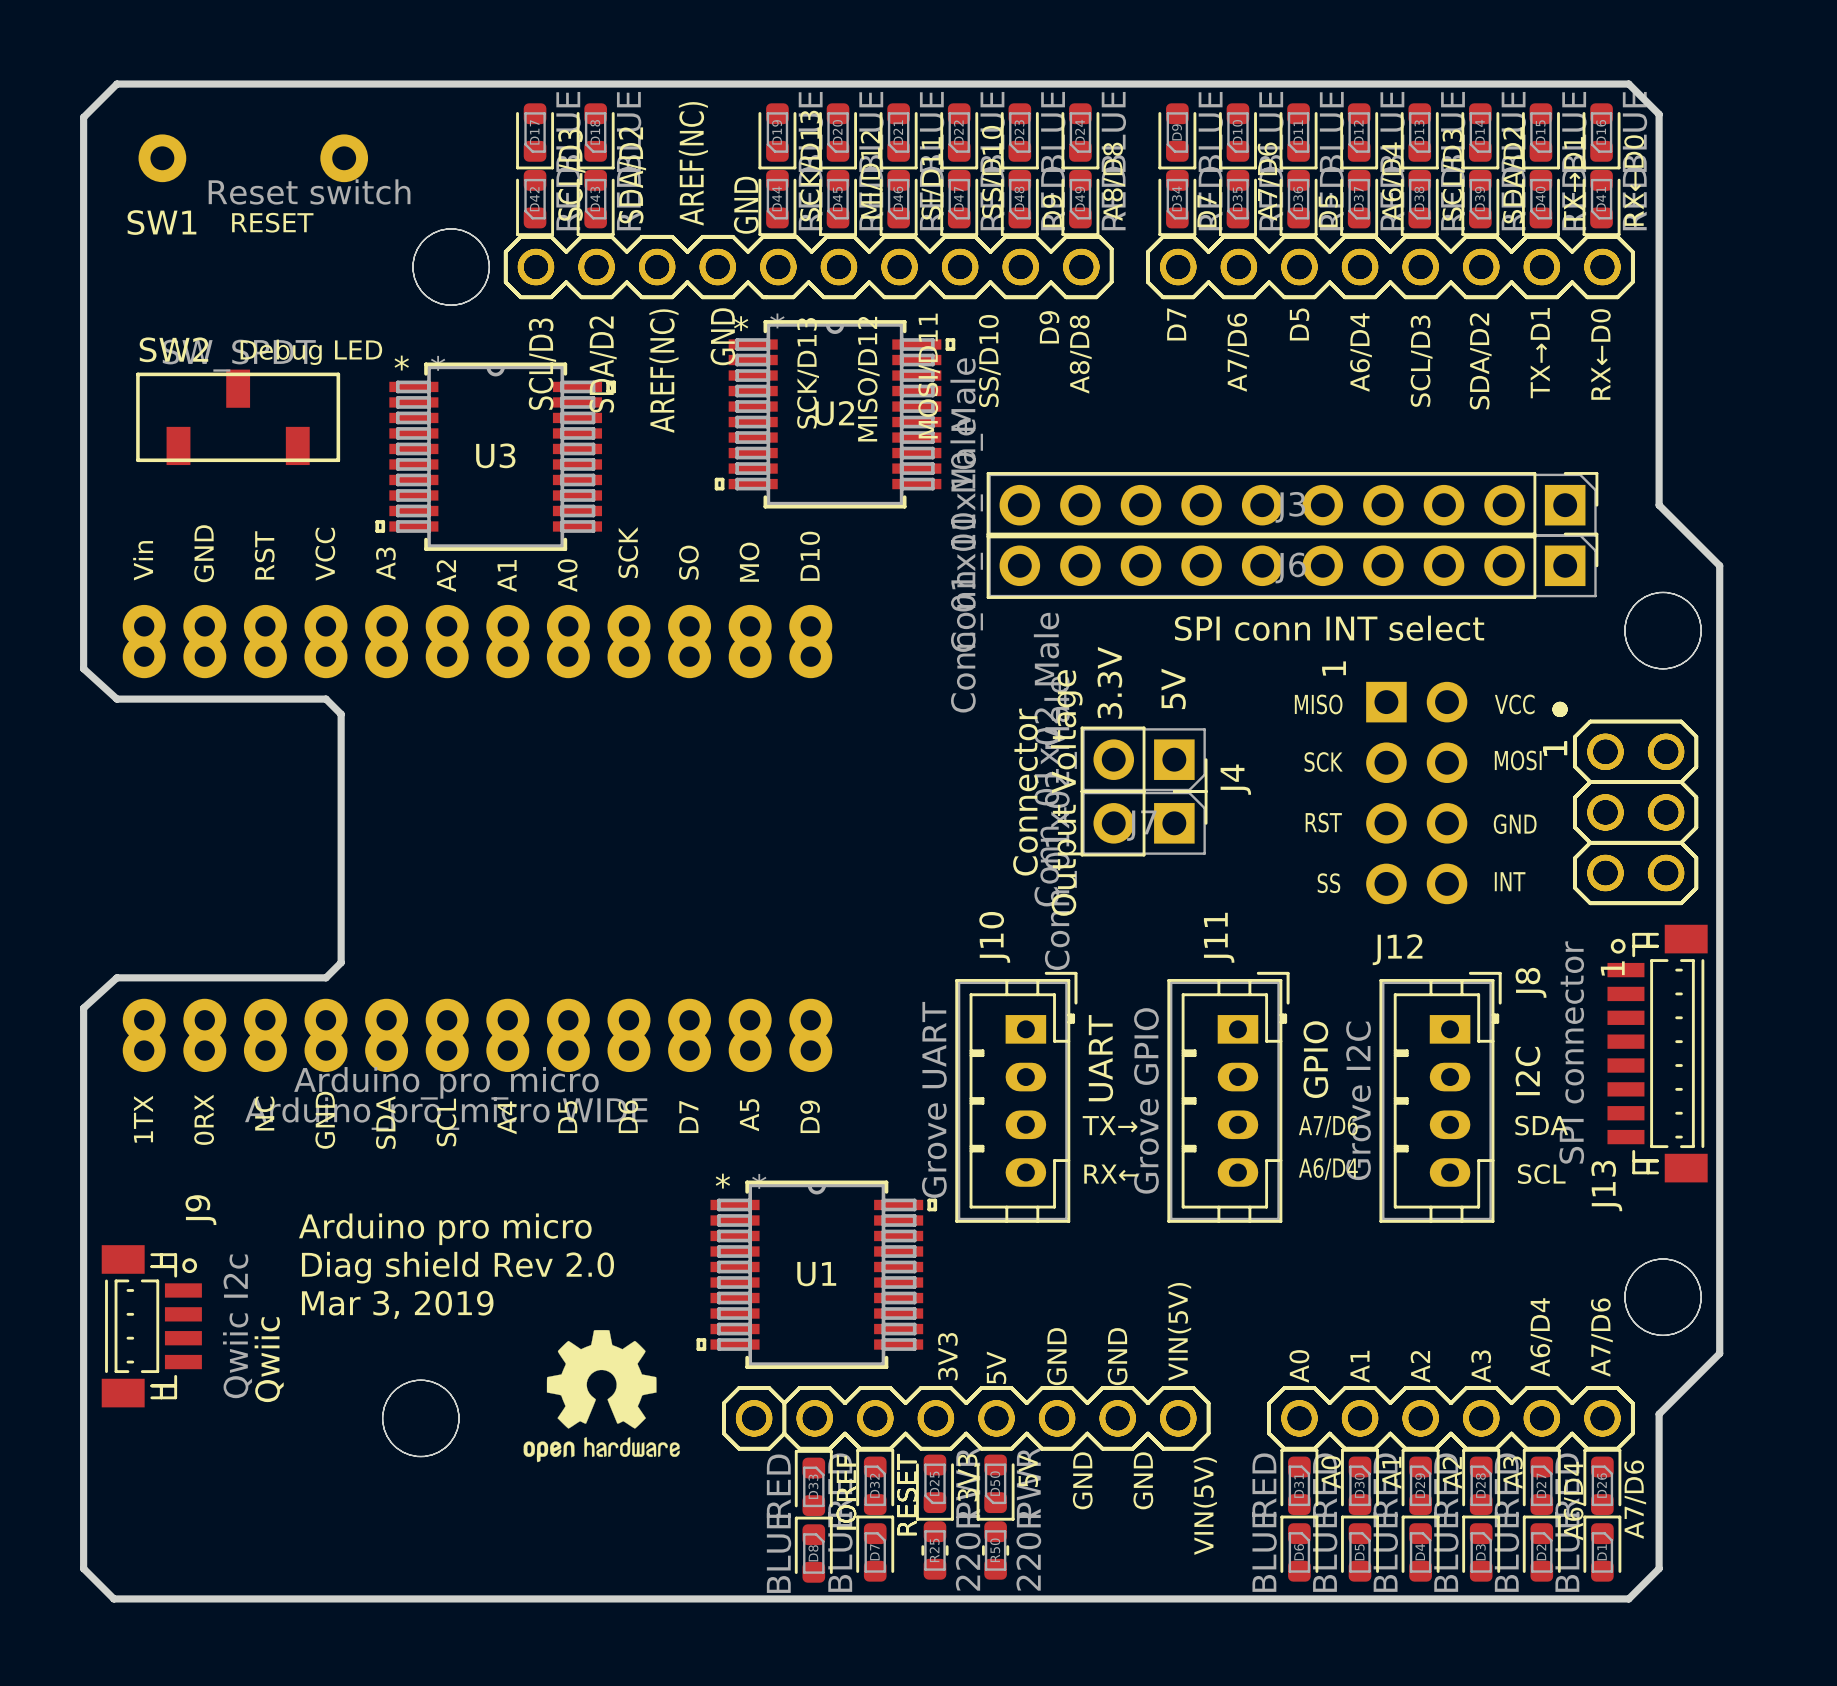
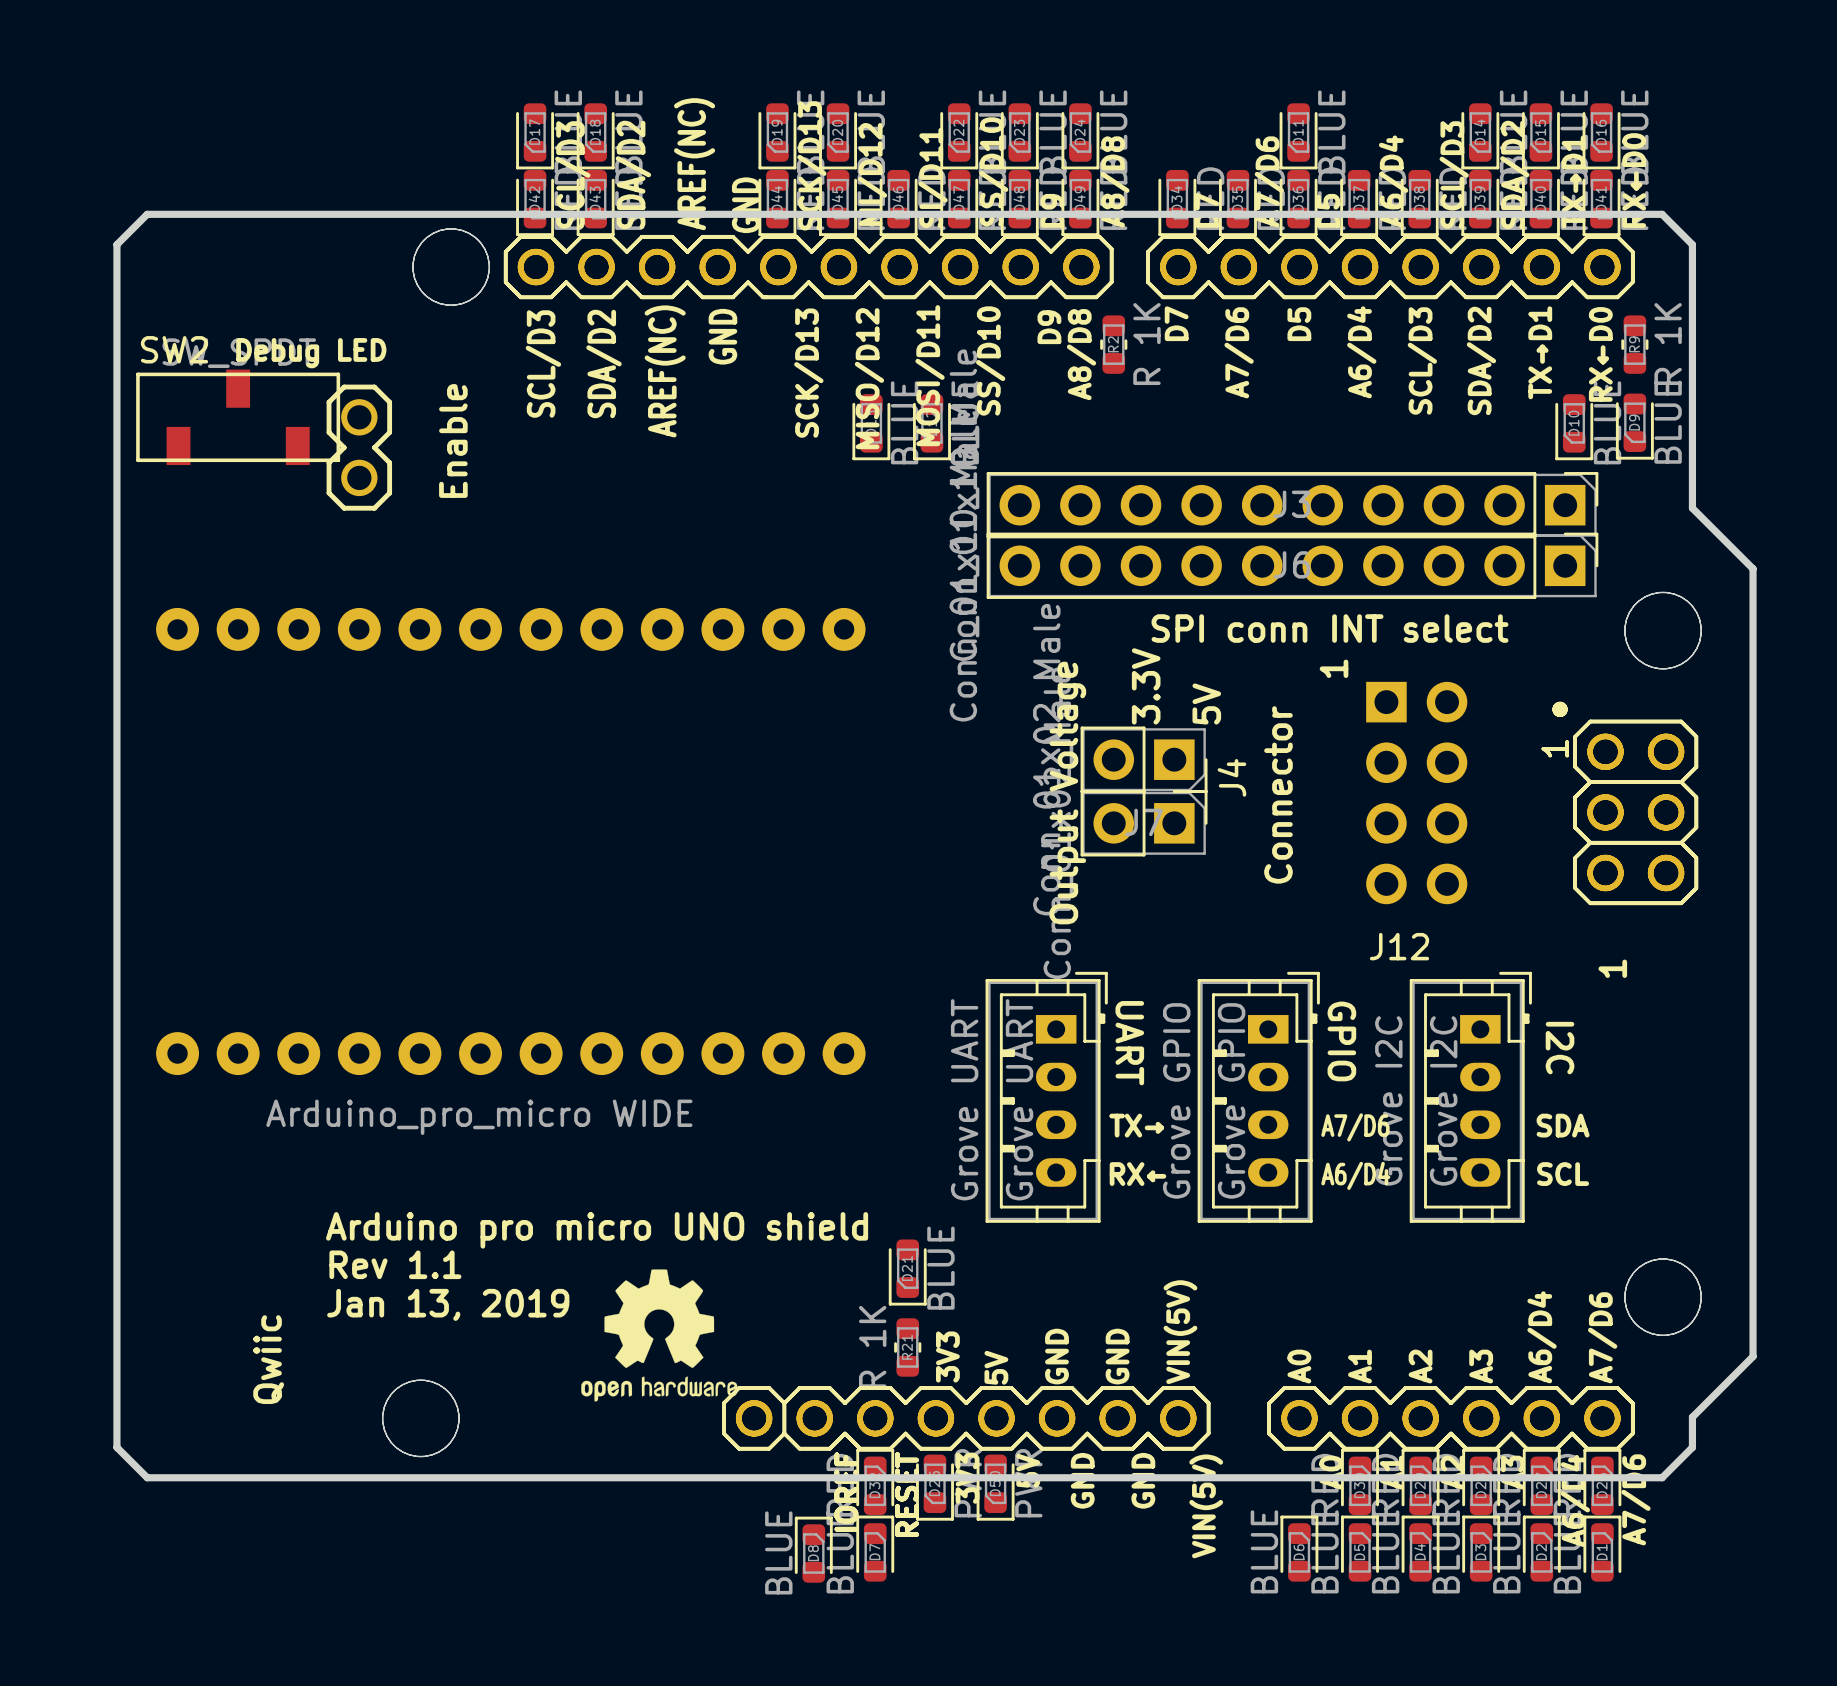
board edge: (116, 84) (1628, 84) (1659, 114) (1659, 505) (1719, 565) (1719, 1353) (1659, 1414) (1659, 1568) (1628, 1598) (113, 1598) (83, 1568) (83, 1008) (116, 977) (326, 977) (341, 962) (341, 714) (326, 699) (116, 699) (83, 668) (83, 117) (116, 84) -> (147, 214) (116, 244) (116, 1447) (147, 1477) (1662, 1477) (1692, 1447) (1692, 1417) (1753, 1356) (1753, 568) (1692, 508) (1692, 244) (1662, 214) (147, 214)
D21 position: (898, 136) -> (907, 1272)
D9 position: (1177, 136) -> (1634, 426)
D10 position: (1237, 136) -> (1574, 427)
D12 position: (1359, 136) -> (931, 427)
D13 position: (1419, 136) -> (871, 427)
SW1: Reset switch (253, 158) -> none
text: RESET (272, 222) -> none
R2: none -> R 1K (1113, 344)
R9: none -> R 1K (1634, 344)
U2: (835, 414) -> none
text: none -> Enable (453, 441)
part: none -> (359, 447)
U3: (495, 456) -> none
text position: 3.3V (1109, 682) -> 3.3V (1146, 686)
text position: 5V (1173, 688) -> 5V (1206, 704)
text: MISO (1318, 704) -> none
text: VCC (1514, 704) -> none
text: MOSI (1518, 760) -> none
text: SCK (1323, 762) -> none
text position: Connector (1025, 792) -> Connector (1278, 794)
text: RST (1323, 822) -> none
text: GND (1515, 824) -> none
part position: (477, 838) -> (510, 841)
part: Arduino_pro_micro (477, 838) -> none
text: INT (1510, 881) -> none
text: SS (1328, 883) -> none
J13: SPI connector (1657, 1053) -> none
text rotation: 0° (1100, 1058) -> 180° (1129, 1043)
text rotation: 0° (1315, 1059) -> 180° (1341, 1041)
text rotation: 0° (1527, 1071) -> 180° (1560, 1048)
J10: Grove UART (1016, 1097) -> none
Grove UART: none -> Grove UART (1046, 1097)
J11: Grove GPIO (1228, 1097) -> none
Grove GPIO: none -> Grove GPIO (1258, 1097)
J8: Grove I2C (1440, 1097) -> none
Grove I2C: none -> Grove I2C (1470, 1097)
text position: TX→ (1110, 1125) -> TX→ (1136, 1125)
text position: SDA (1541, 1125) -> SDA (1563, 1125)
text position: A7/D6 (1328, 1126) -> A7/D6 (1355, 1127)
text position: A6/D4 (1328, 1169) -> A6/D4 (1355, 1175)
text position: RX← (1111, 1174) -> RX← (1137, 1174)
text position: SCL (1541, 1174) -> SCL (1563, 1174)
text: Arduino pro micro (445, 1229) -> Arduino pro micro UNO shield (597, 1230)
text: none -> Rev 1.1 (395, 1264)
text: Diag shield Rev 2.0 (457, 1267) -> none
U1: (816, 1274) -> none
text: Mar 3, 2019 (397, 1304) -> Jan 13, 2019 (448, 1304)
J9: Qwiic I2c (151, 1326) -> none
R21: none -> R 1K (907, 1347)
drawing position: (601, 1396) -> (659, 1335)
D31: RED (1299, 1481) -> none
D33: RED (813, 1483) -> none
R25: 220R (934, 1550) -> none
R50: 220R (995, 1550) -> none

